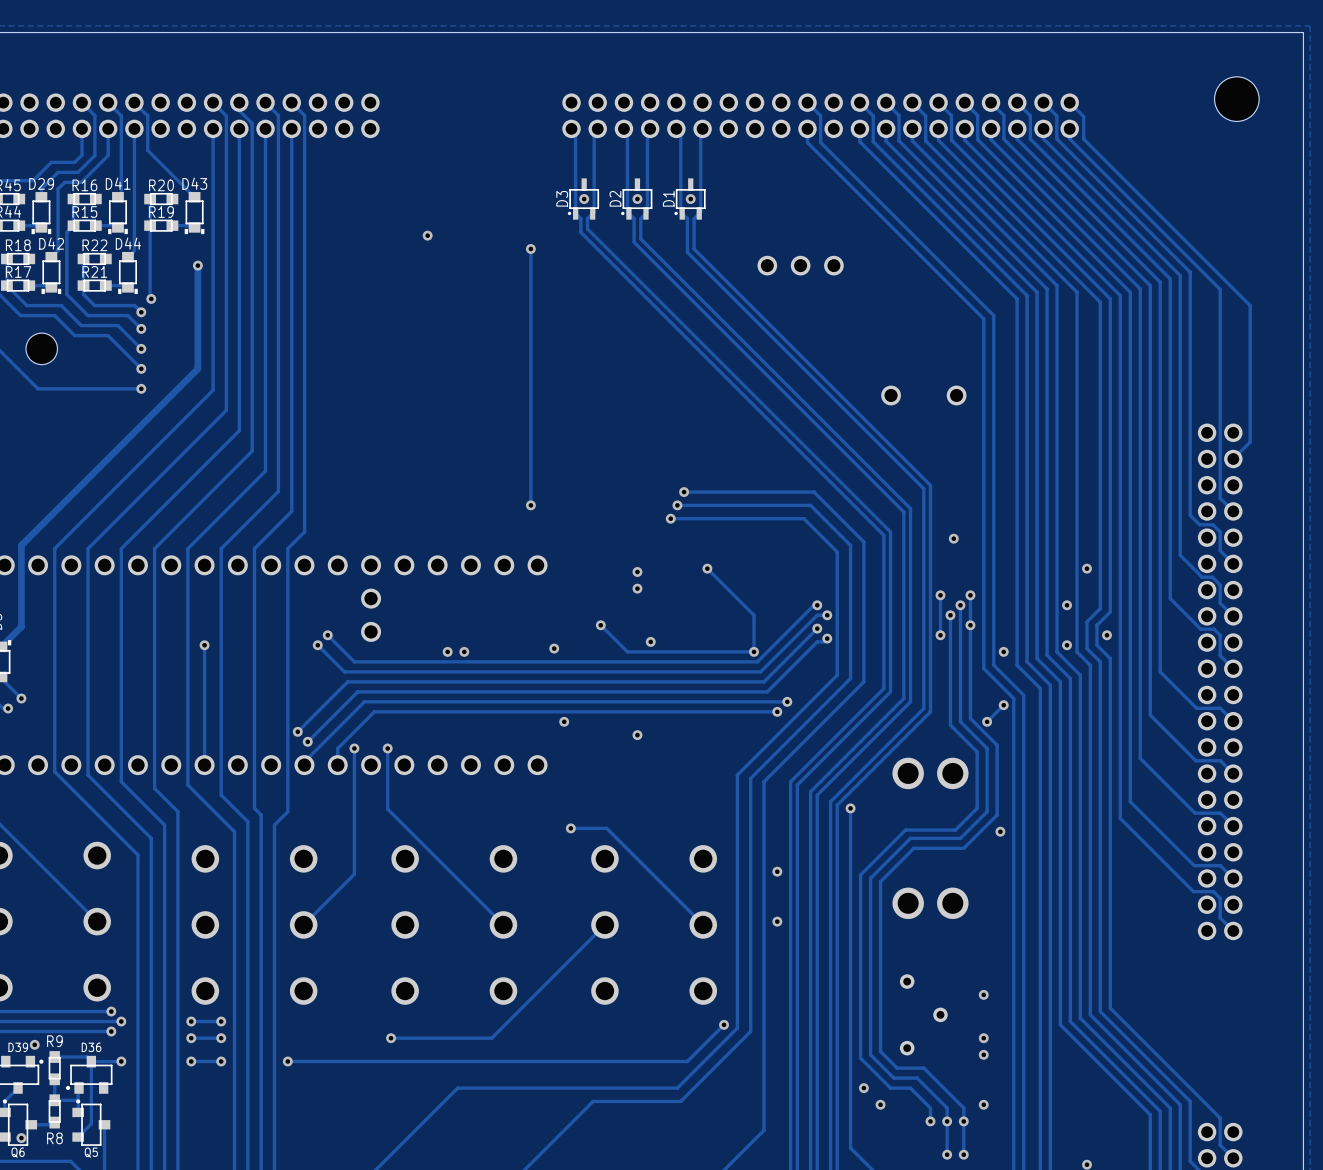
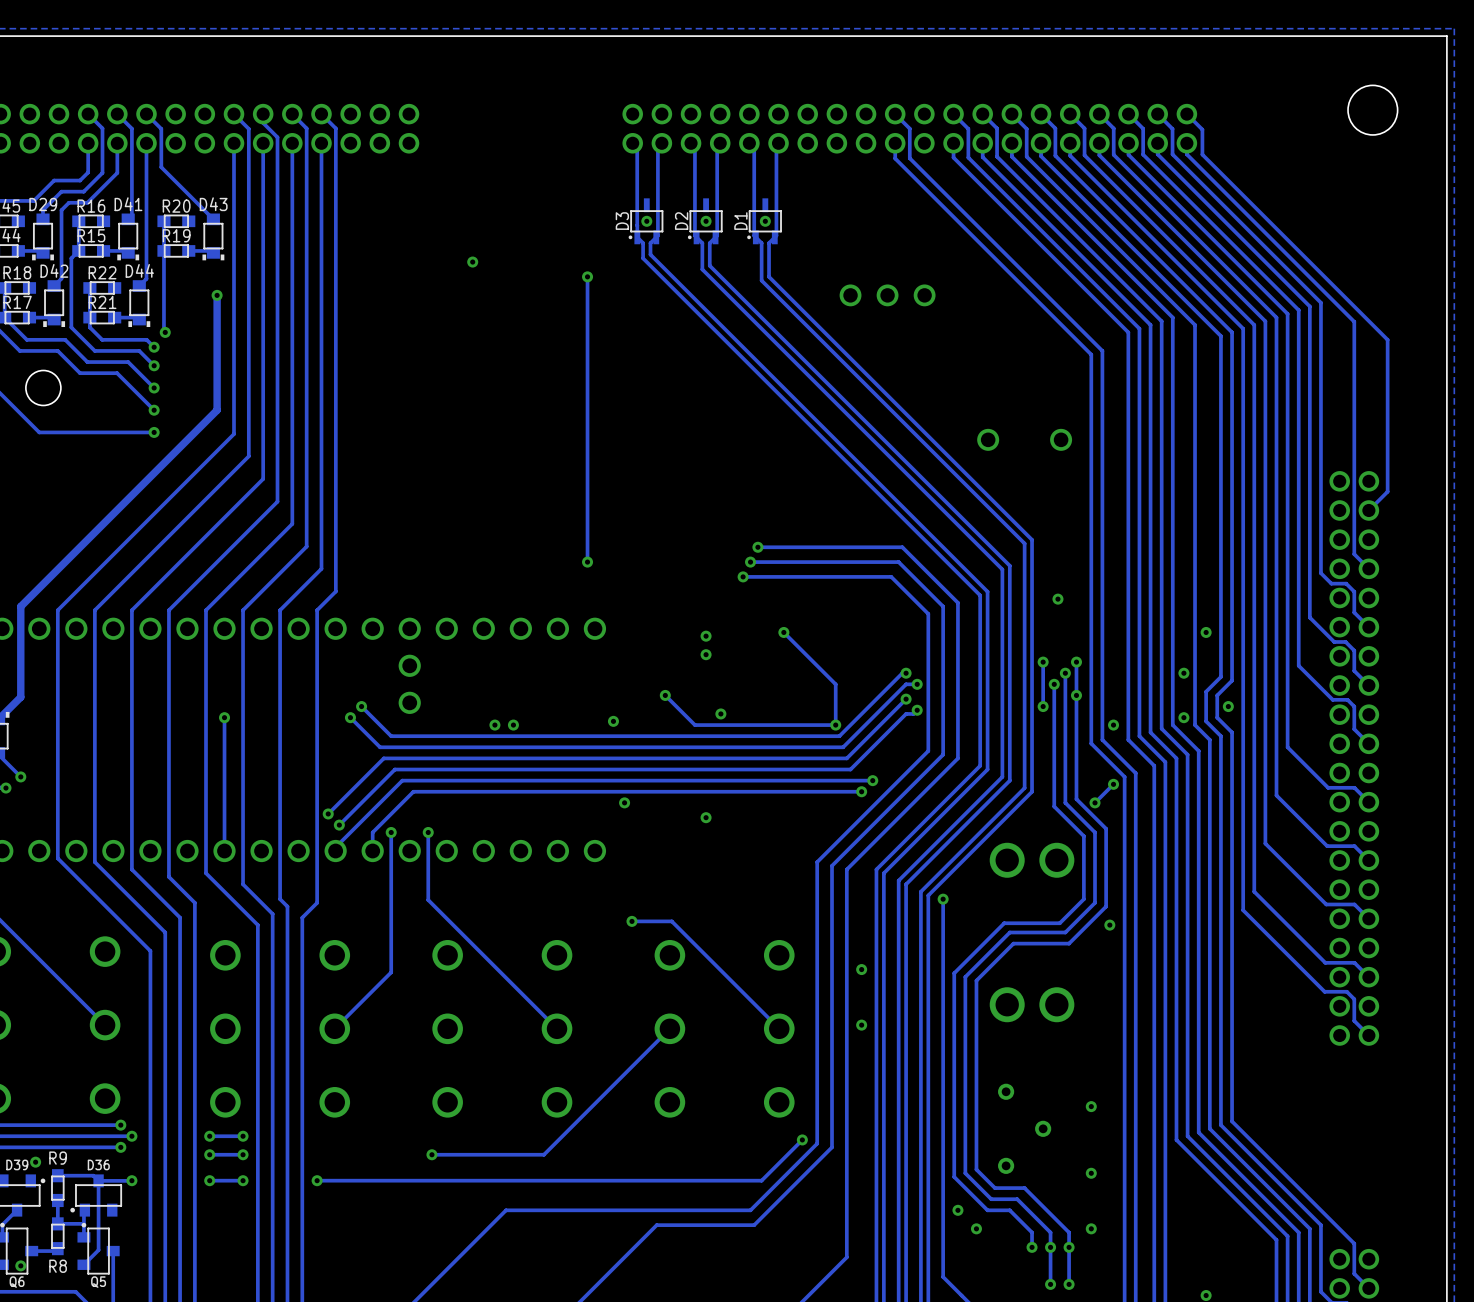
via: (983, 1038) -> none

